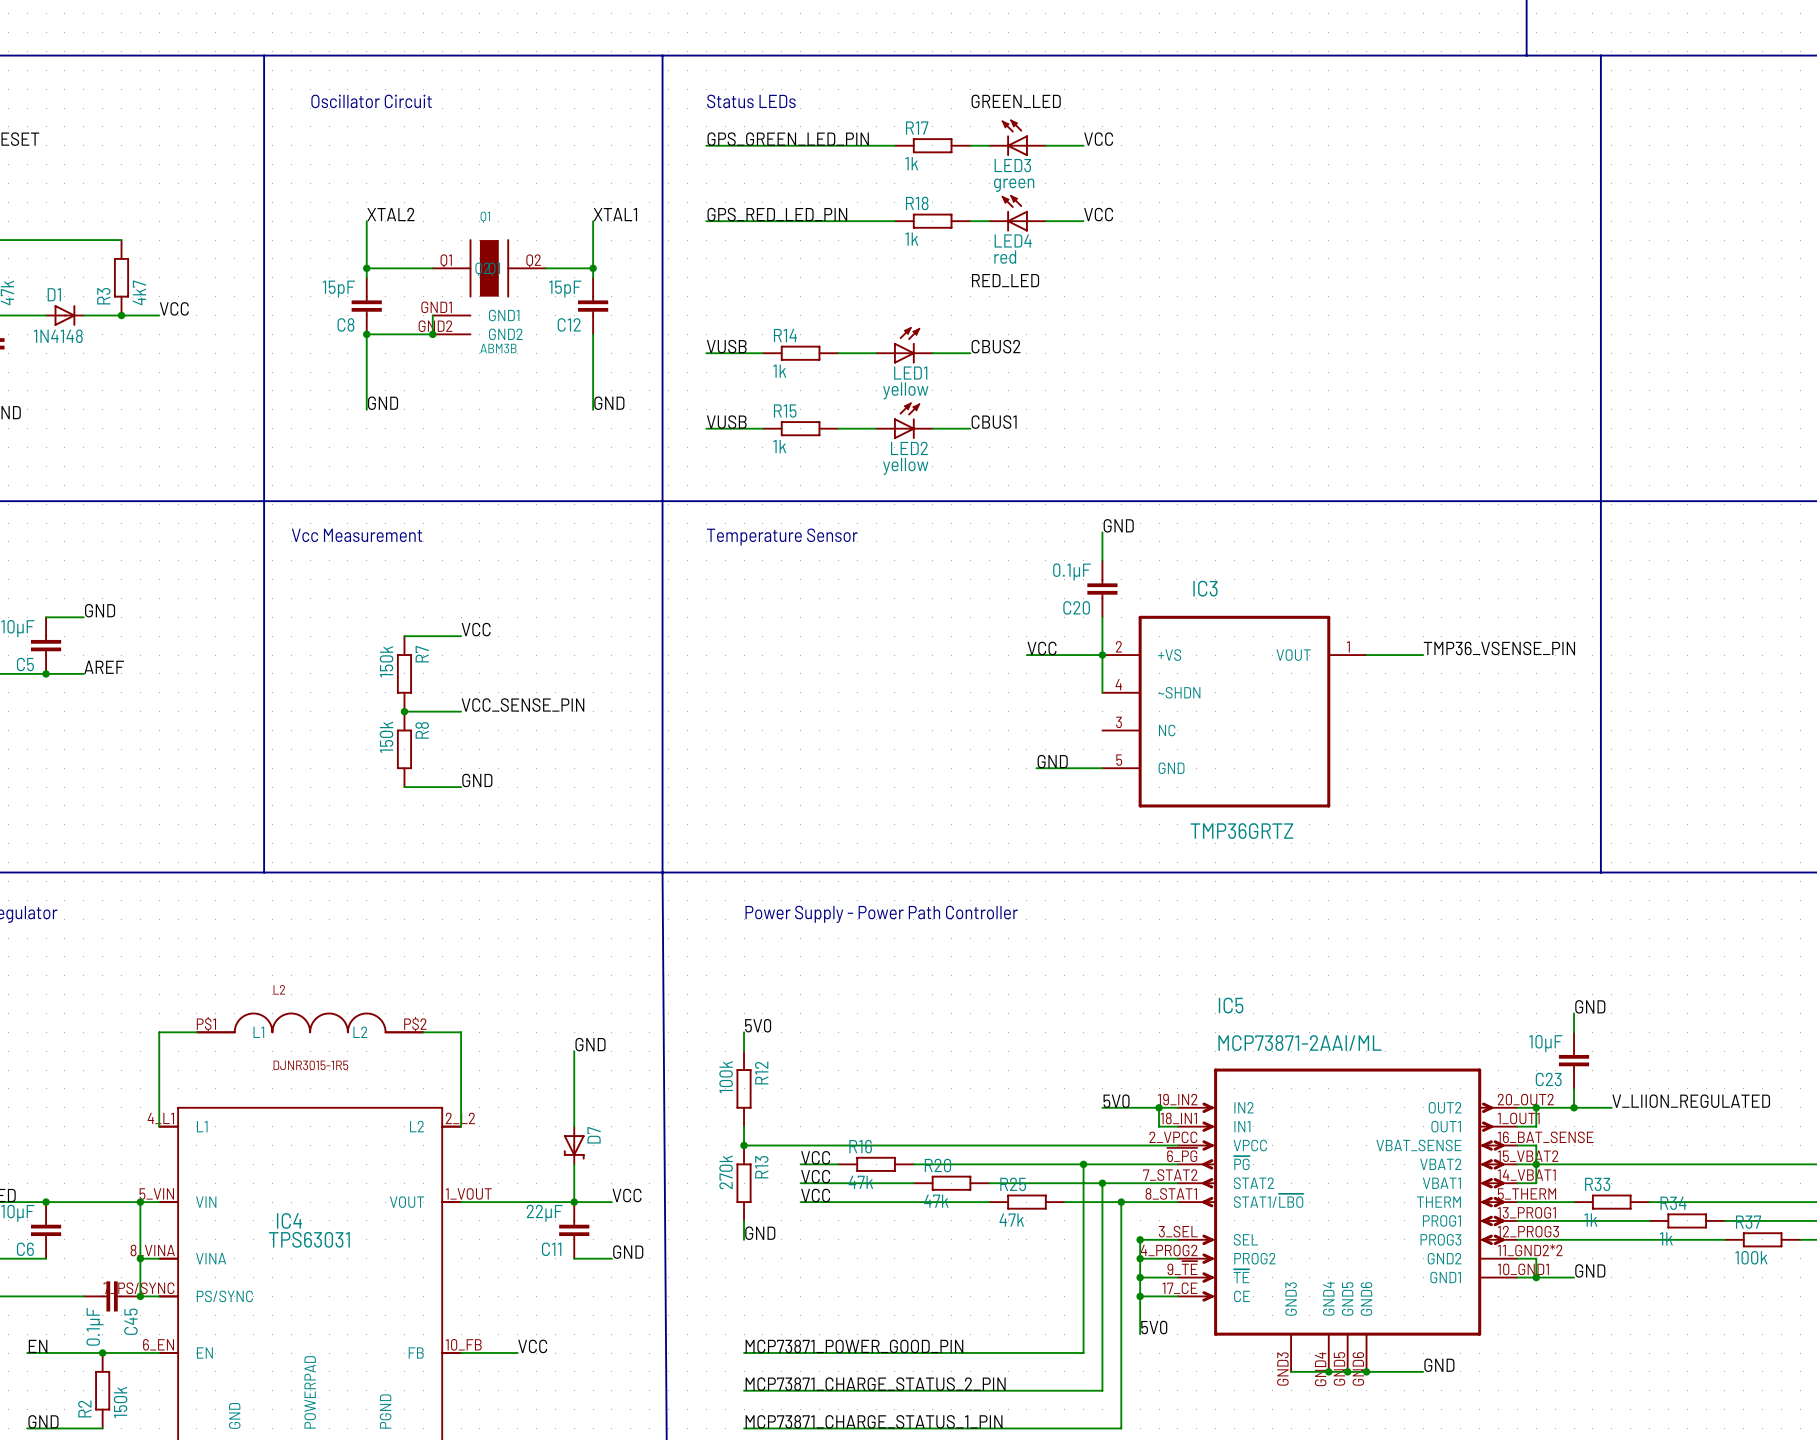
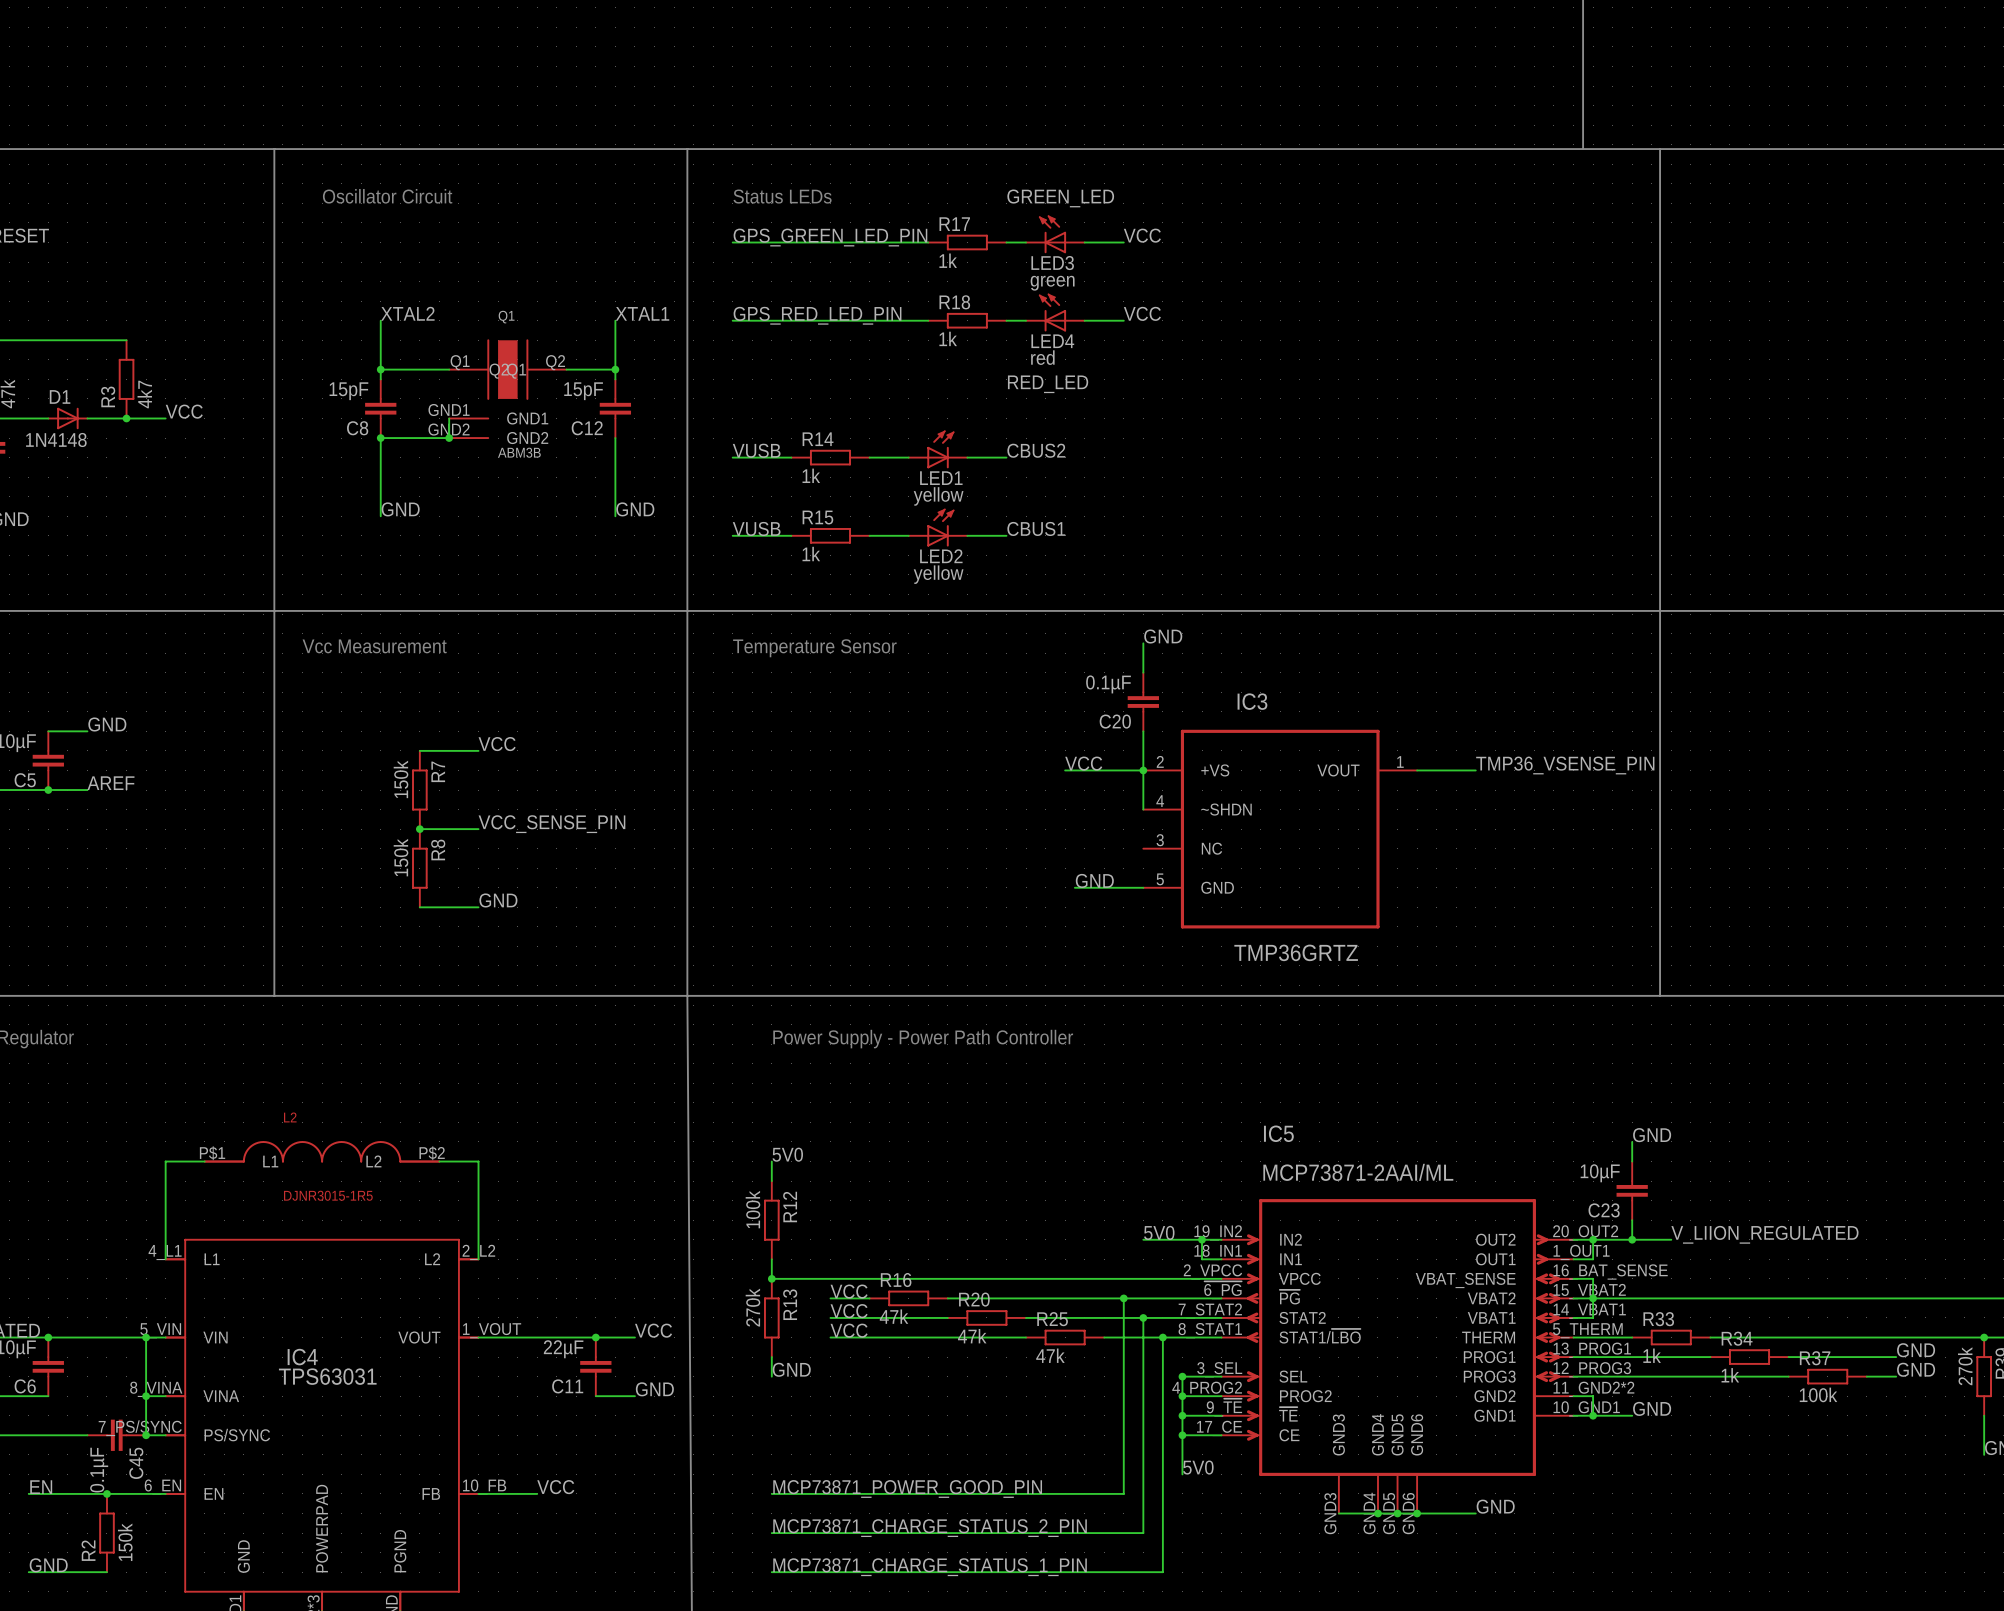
label: GND (590, 1044) -> none
wire: (574, 1051) (574, 1126) -> none
D7: (574, 1145) -> none
wire: (574, 1164) (574, 1202) -> none

